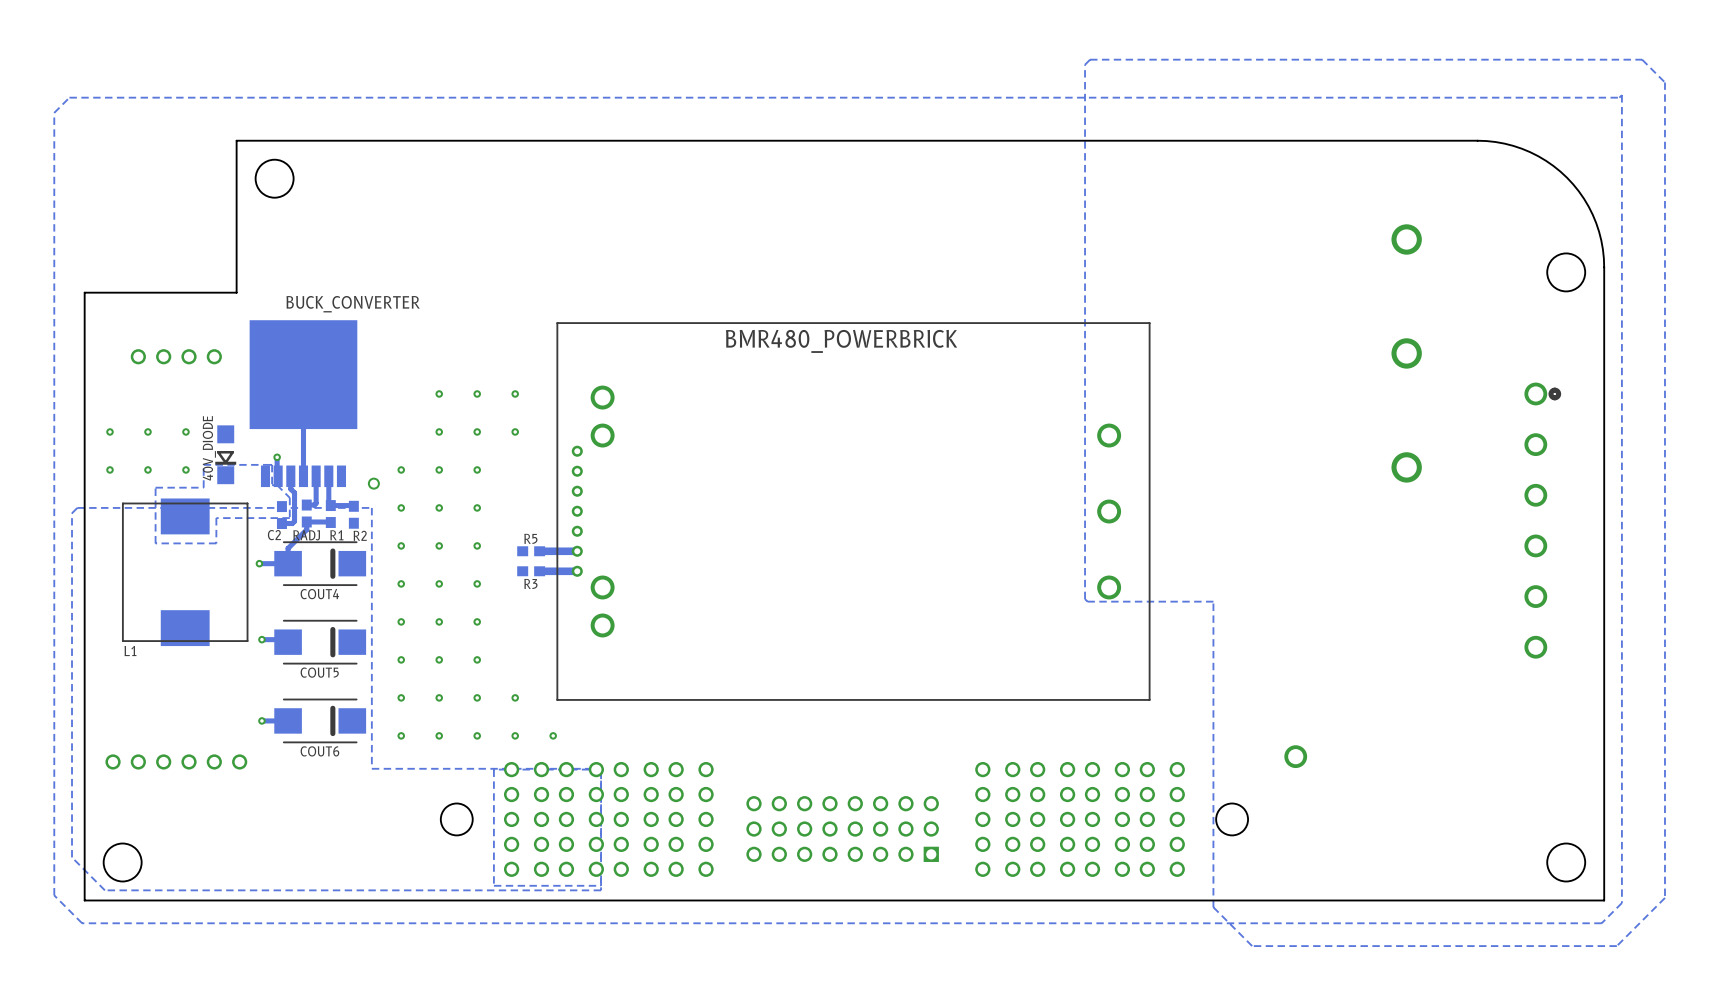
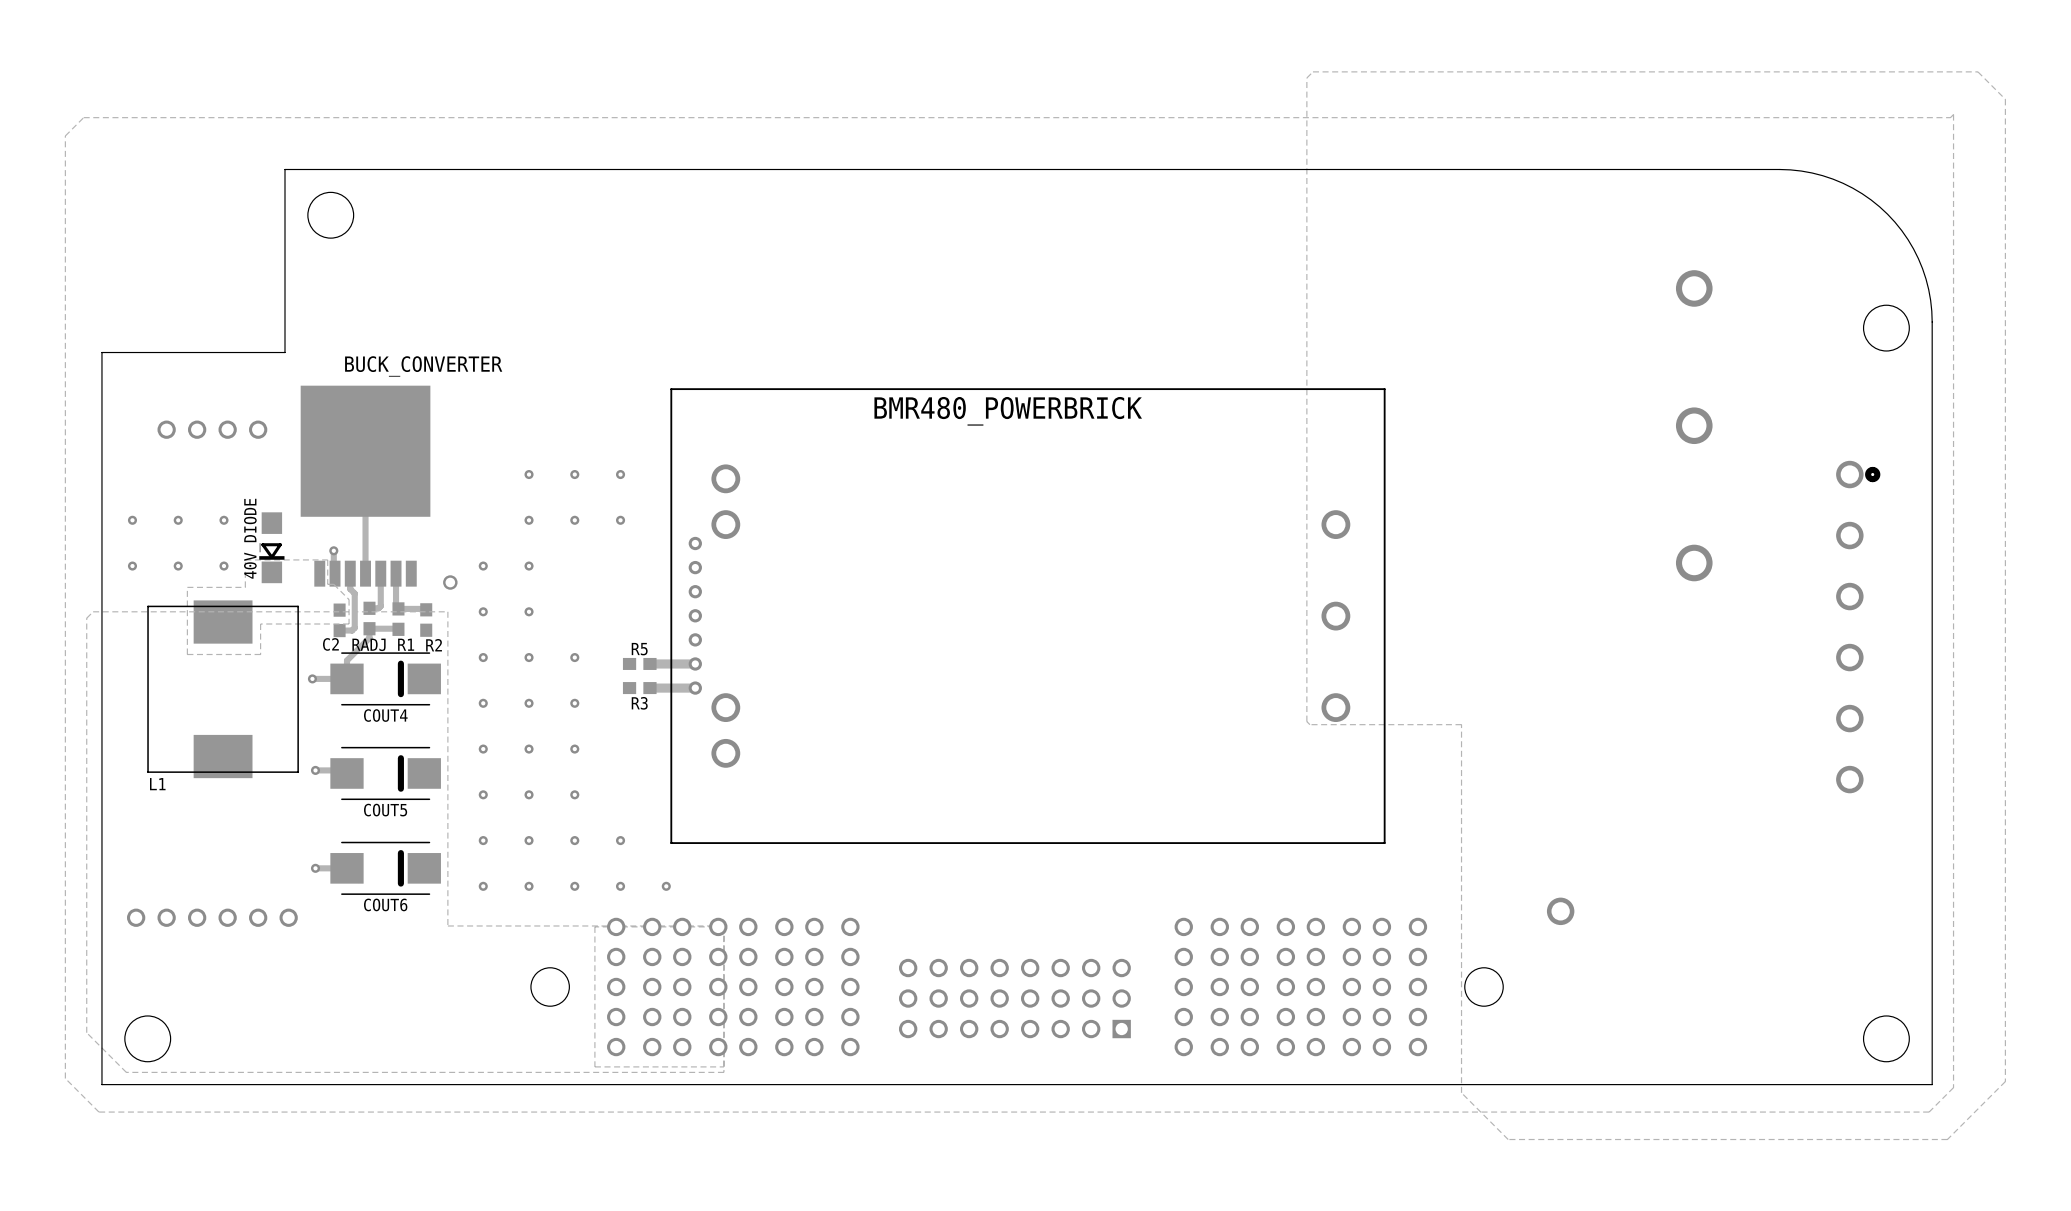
via: (477, 469) -> none
via: (477, 507) -> none

